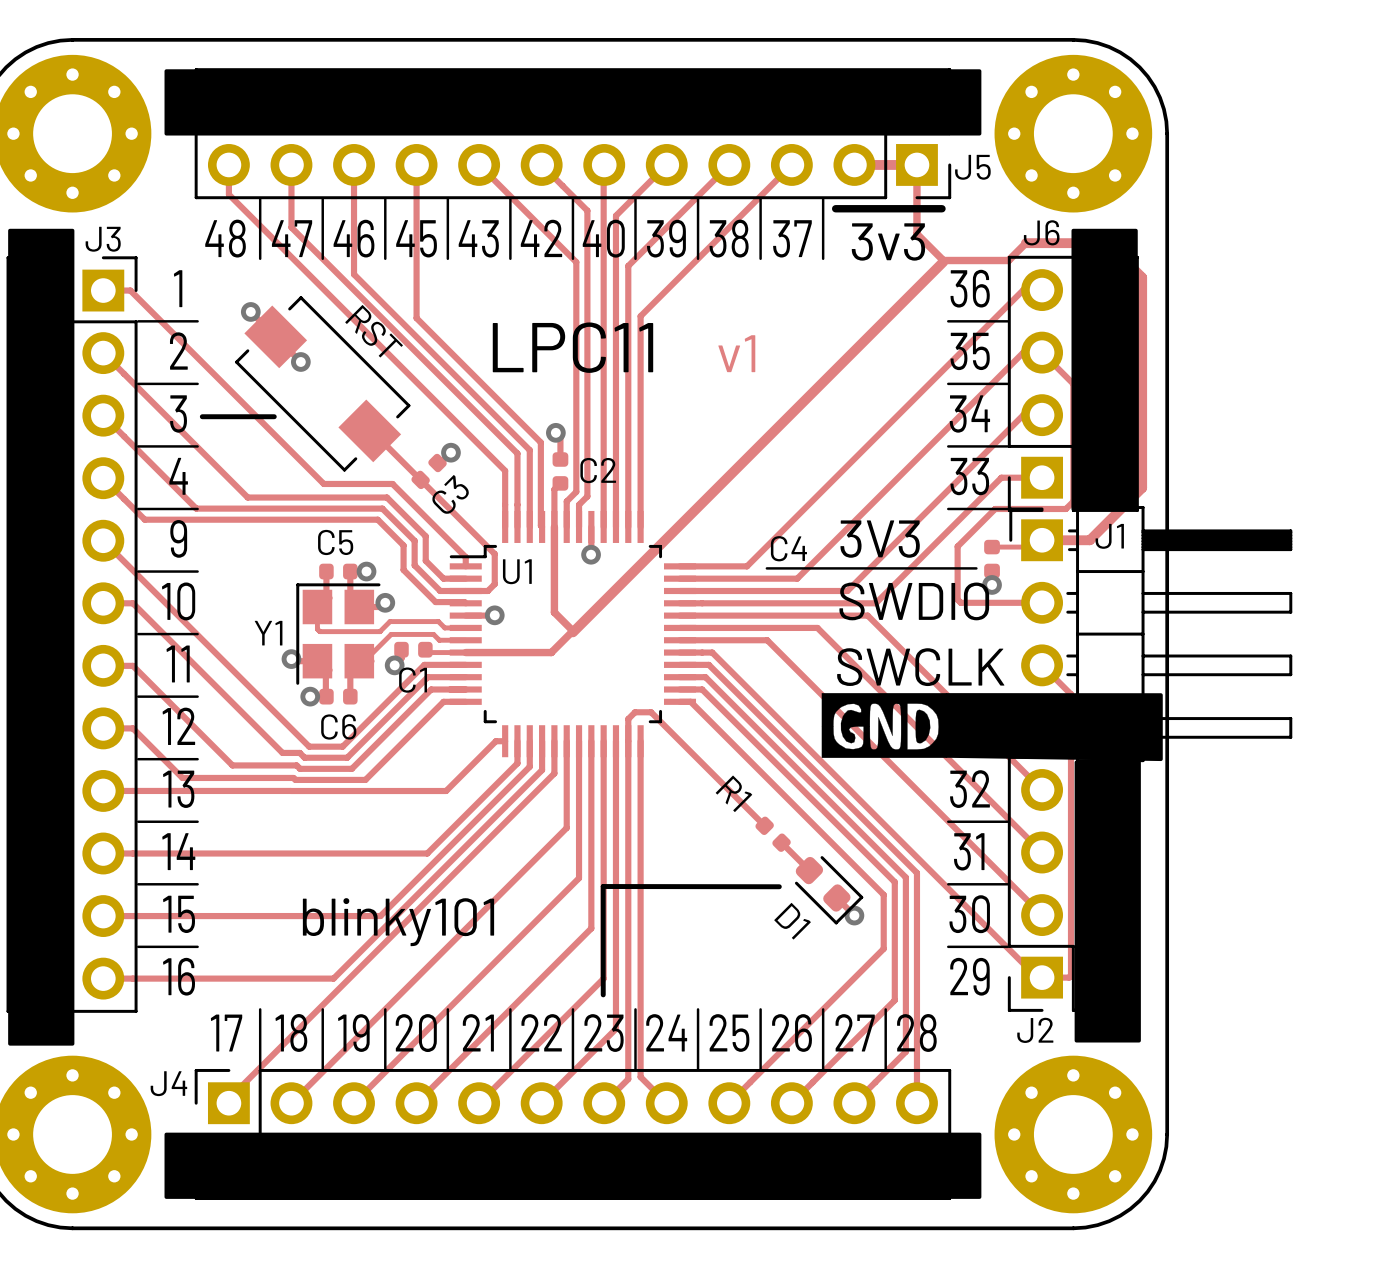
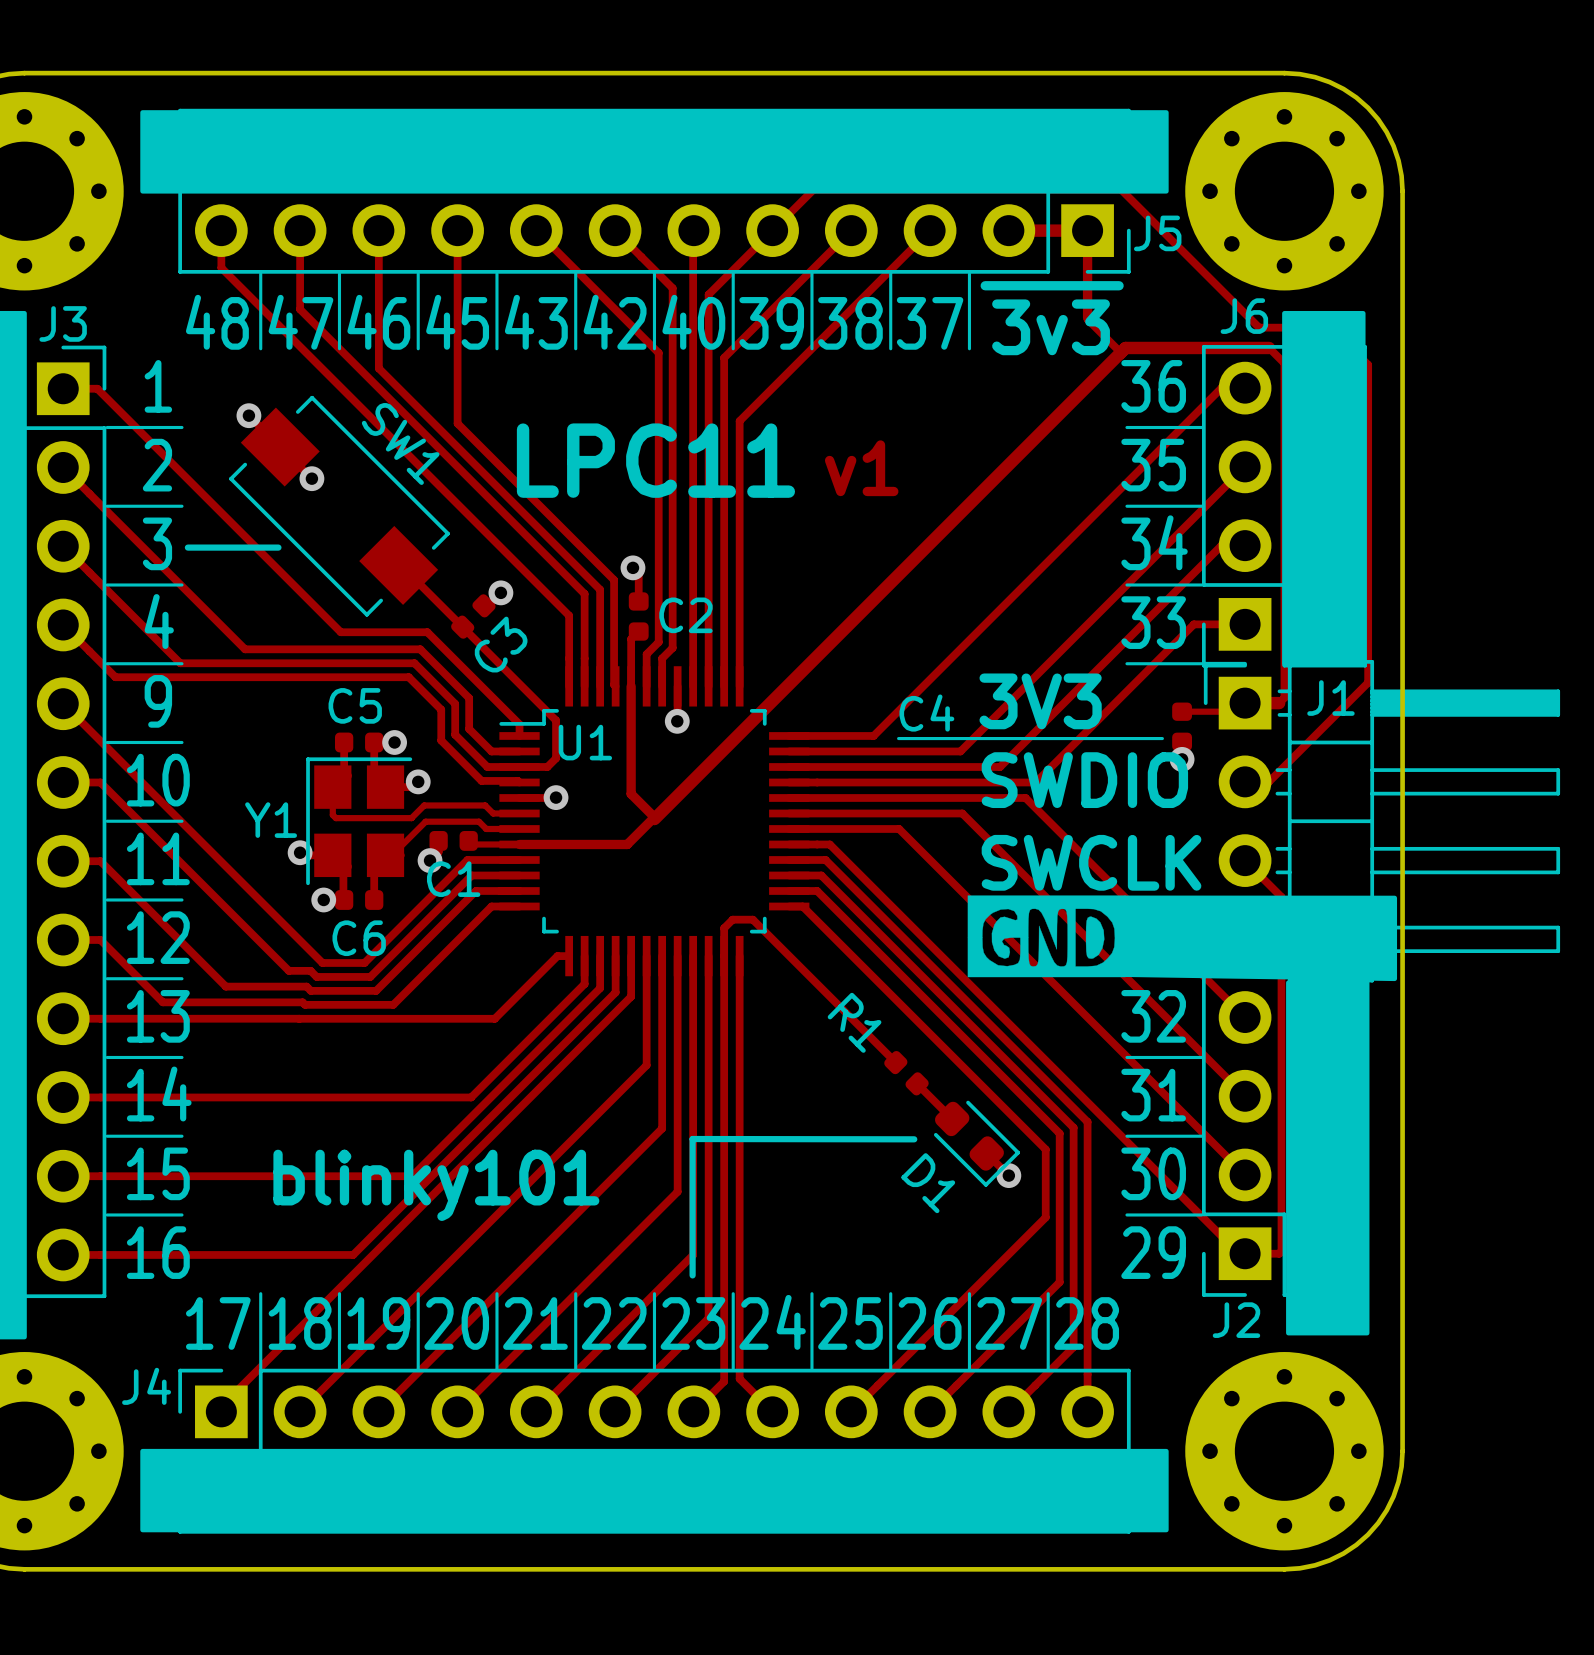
track: none -> (772, 230) (813, 189) (1121, 189) (1259, 327) (1330, 327) (1368, 364) (1368, 682) (1268, 781) (1245, 781)
track: (916, 234) (943, 260) (1008, 260) (1025, 243) (1107, 243) (1142, 277) (1142, 487) (1089, 540) (1069, 540) -> (1087, 317) (1120, 352) (1125, 347) (1269, 347) (1284, 363) (1284, 506)
RST name: RST (374, 331) -> SW1 (400, 443)
track: (1073, 383) (1042, 352) (1023, 352) (797, 578) -> (1245, 466) (960, 751) (936, 751)
track: (1073, 501) (1065, 508) (995, 508) (957, 546) (957, 599) (960, 602) (1042, 602) -> (1284, 654) (1284, 697) (1279, 703)

